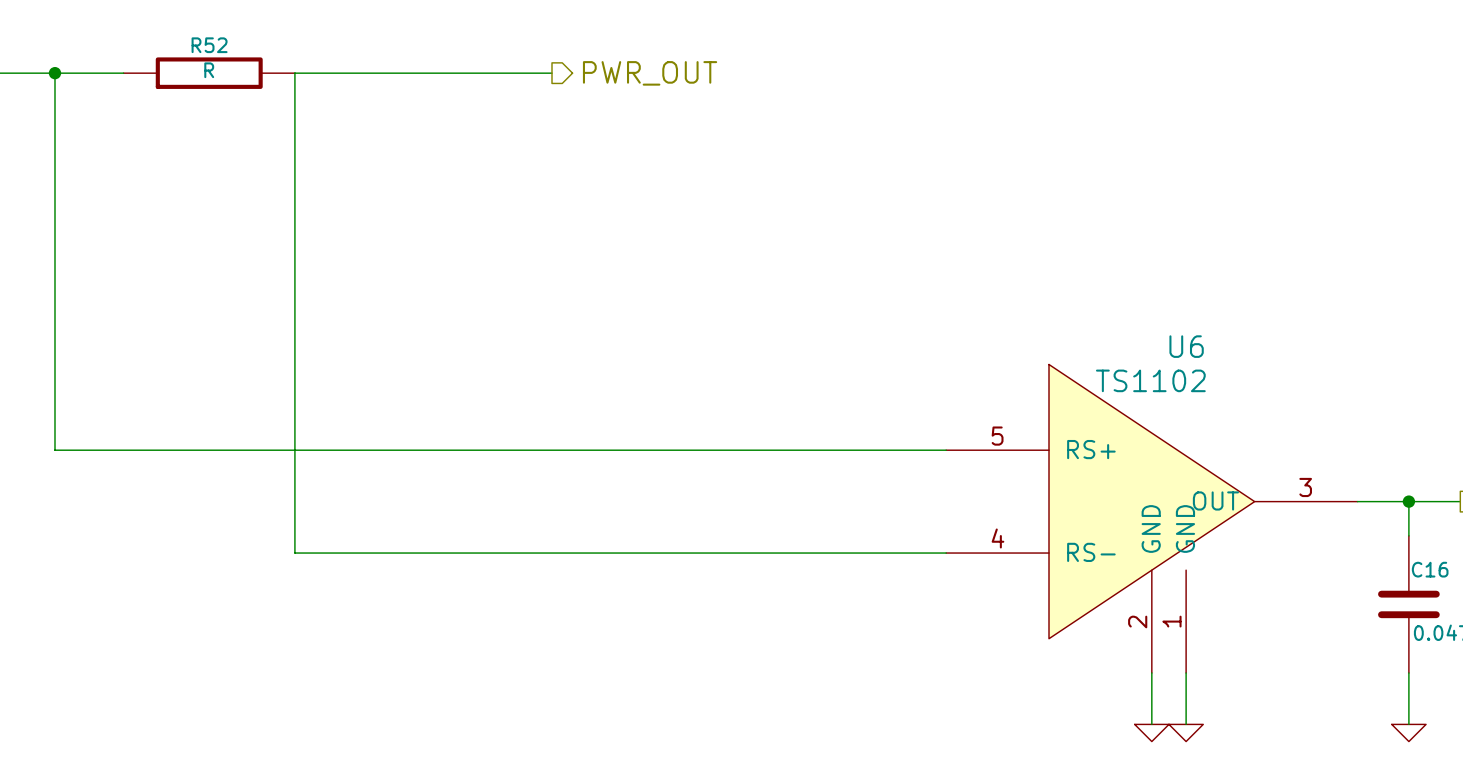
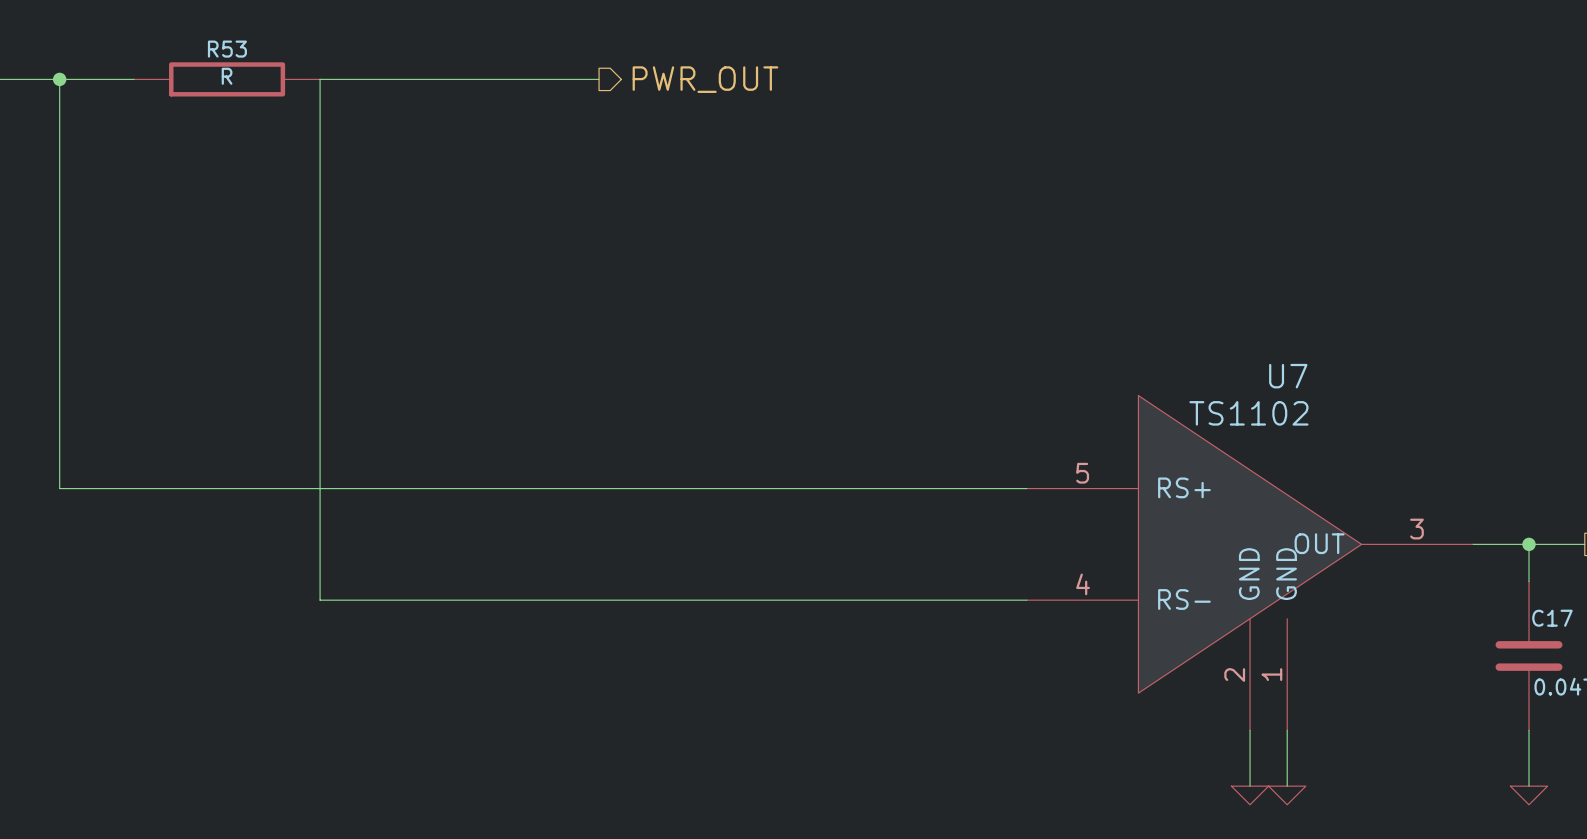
R52 name: R52 (209, 45) -> R53 (227, 49)
U6 name: U6 (1186, 346) -> U7 (1288, 376)
C16 name: C16 (1430, 569) -> C17 (1552, 618)

